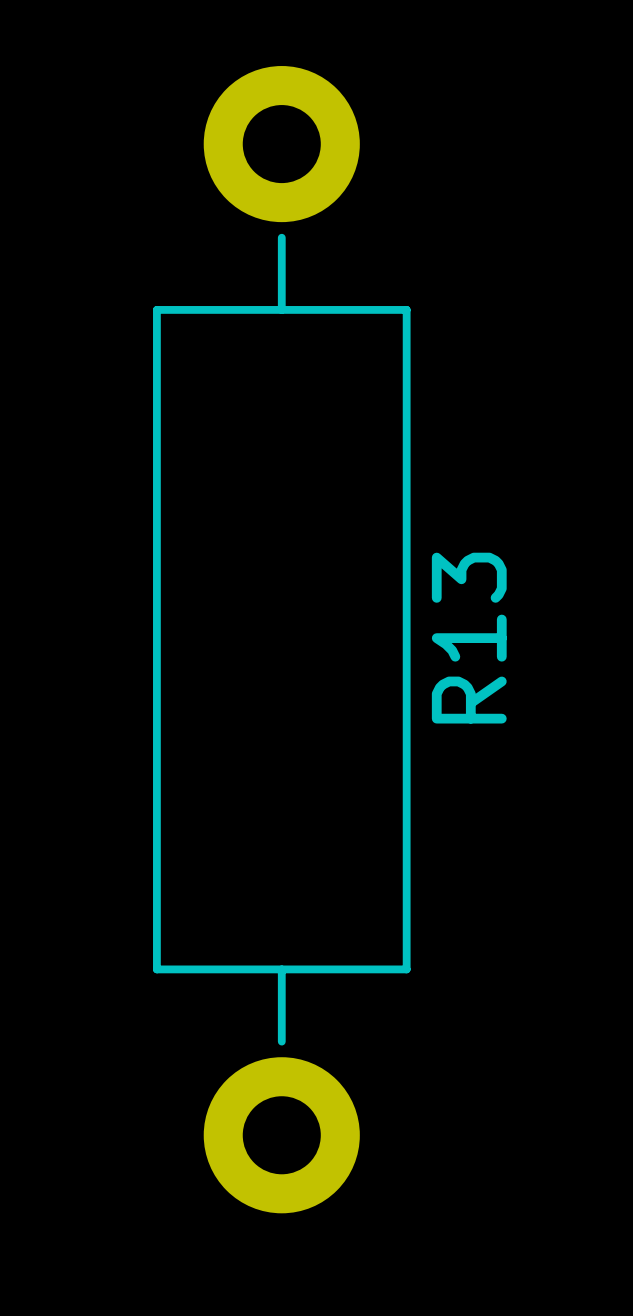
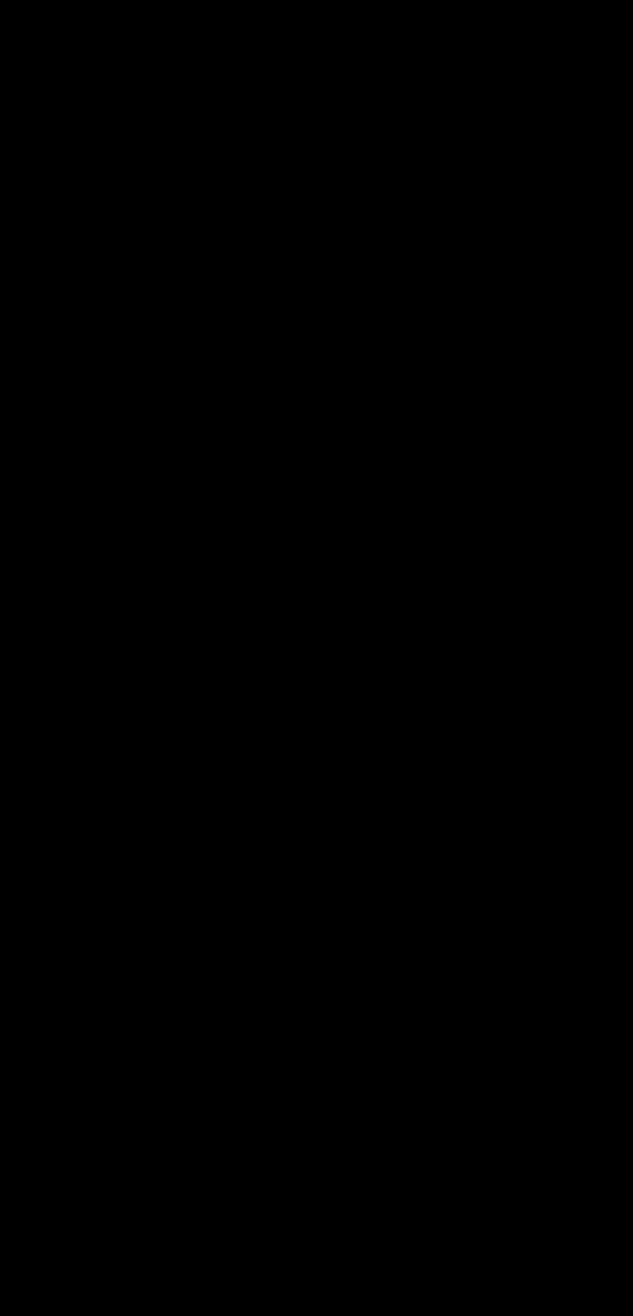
R13: (281, 639) -> none

